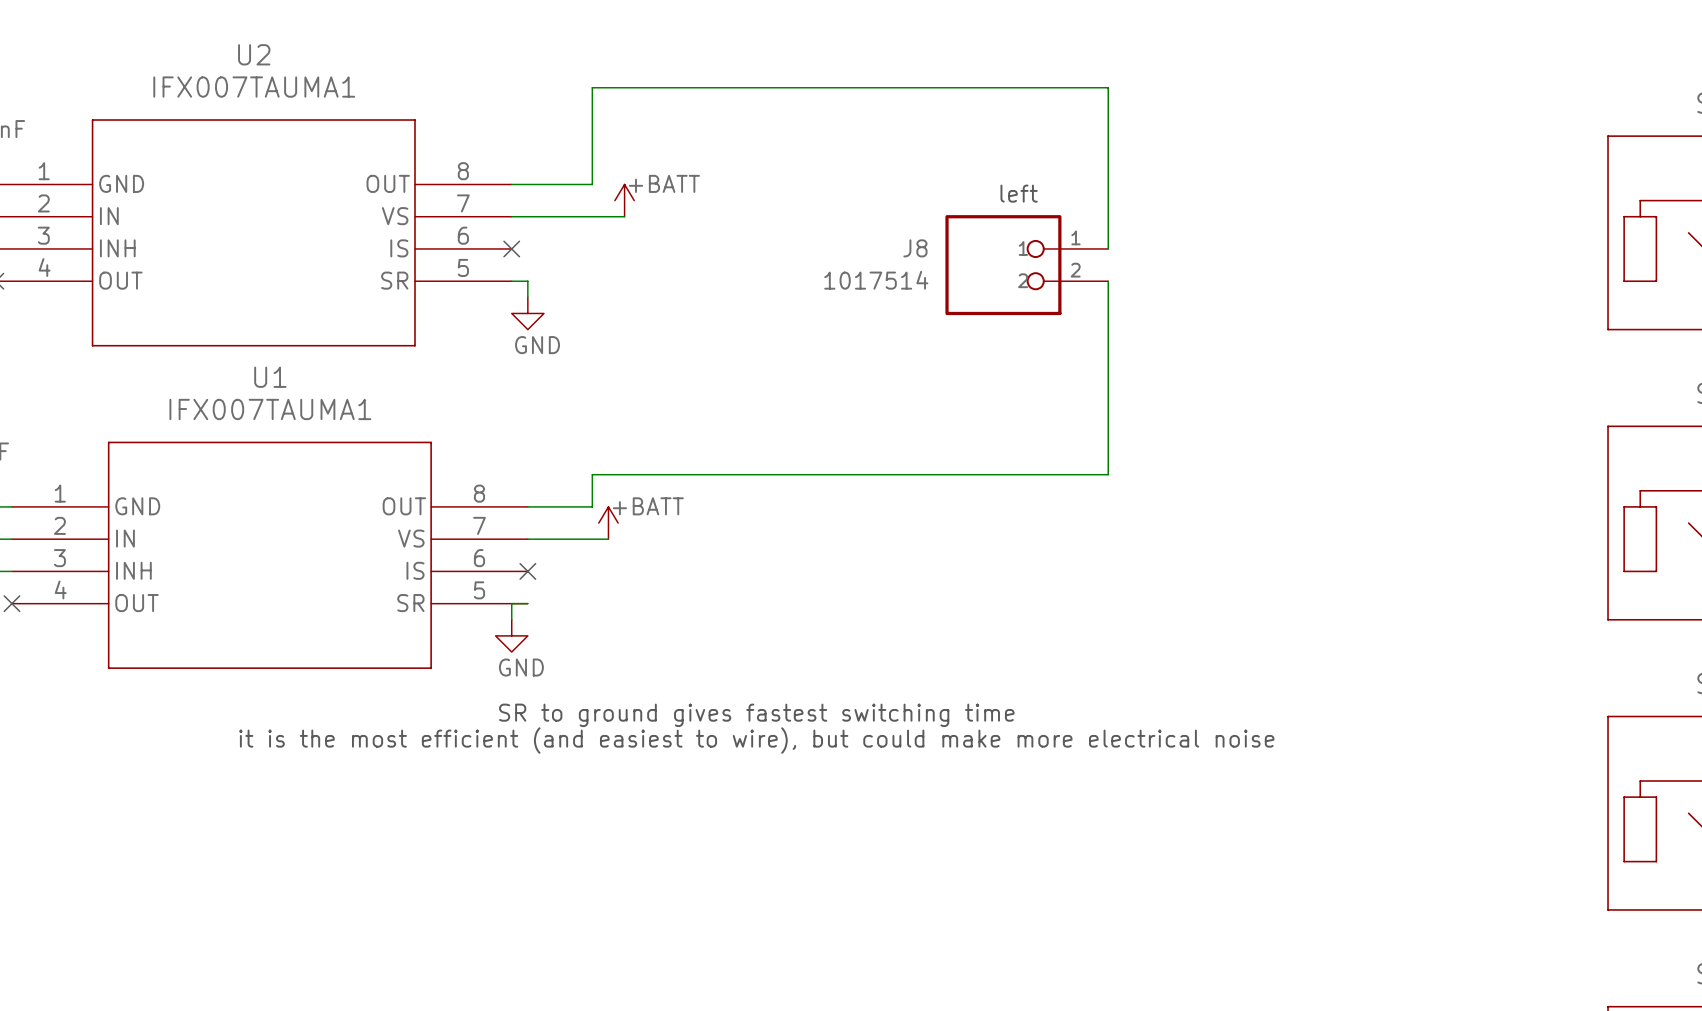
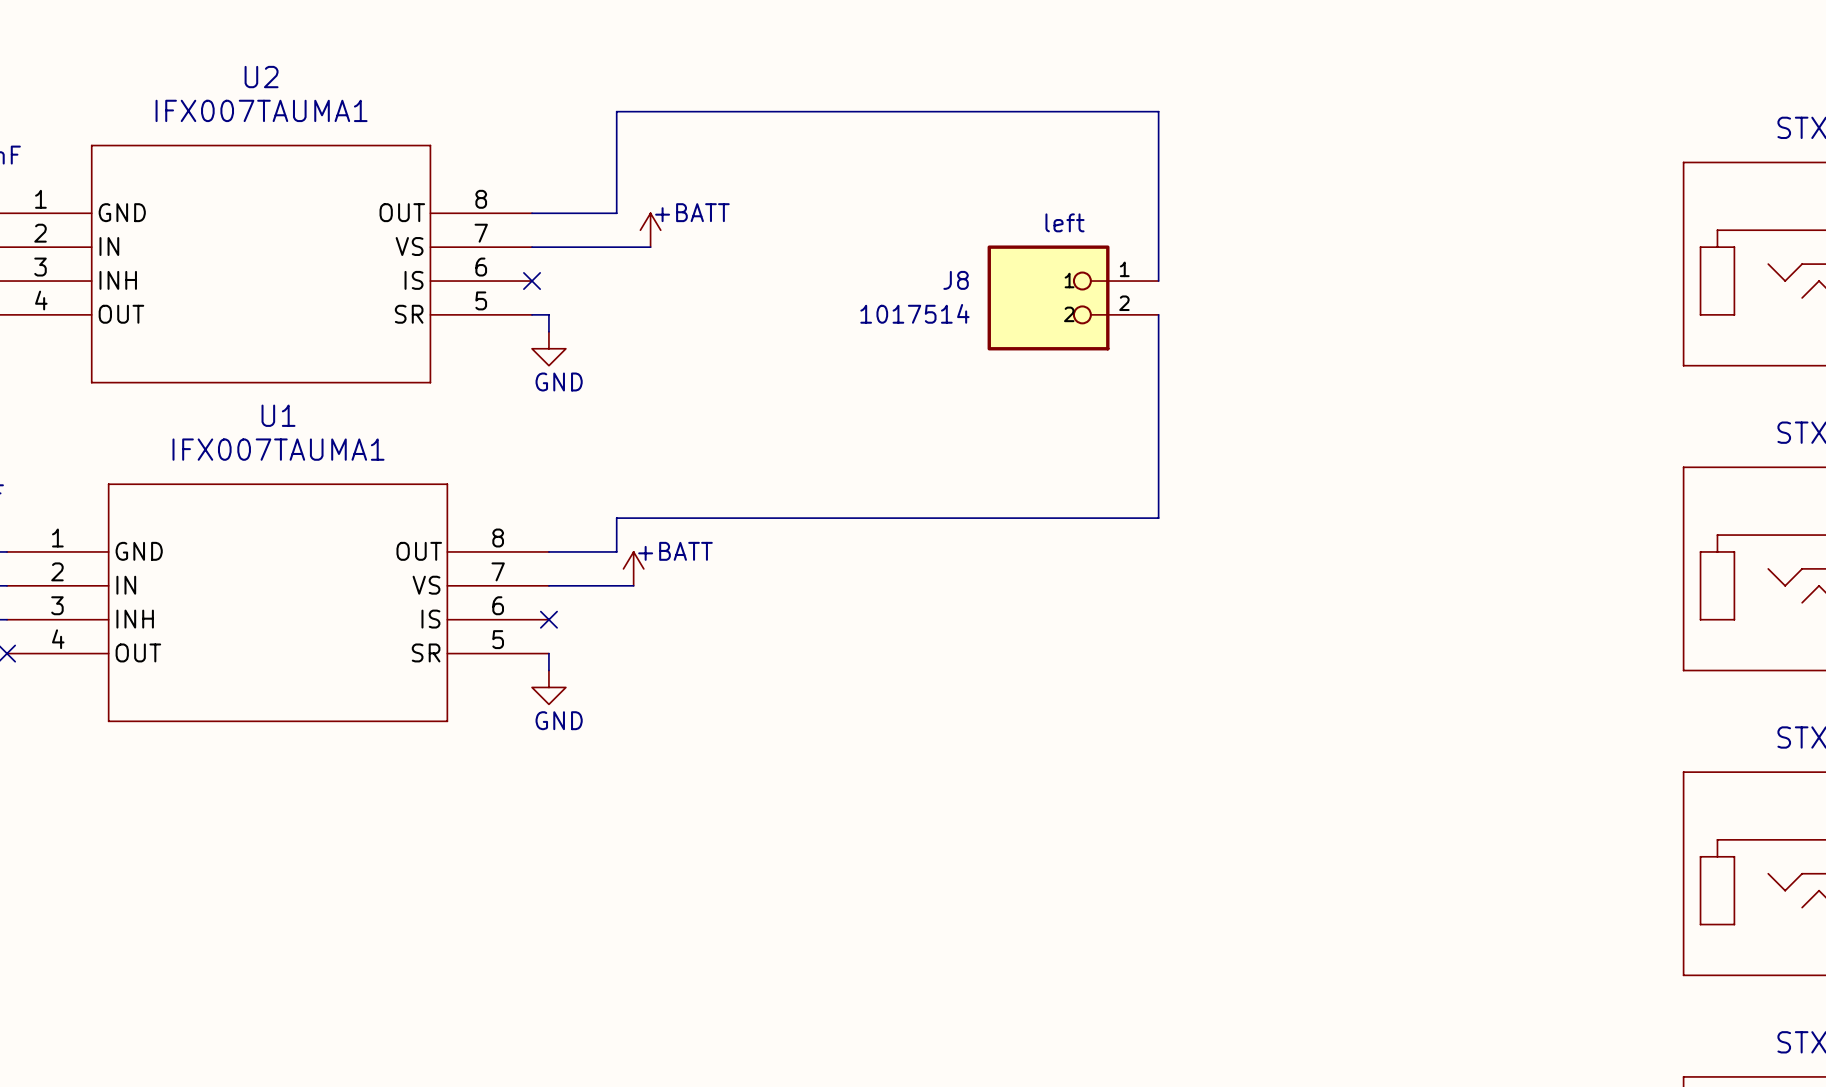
wire: (527, 603) (511, 603) (511, 619) -> (548, 653) (548, 670)
power symbol position: GND (511, 635) -> GND (548, 687)
text: SR to ground gives fastest switching time (756, 715) -> none
text: it is the most efficient (and easiest to wire), but could make more electrical noise (756, 740) -> none

